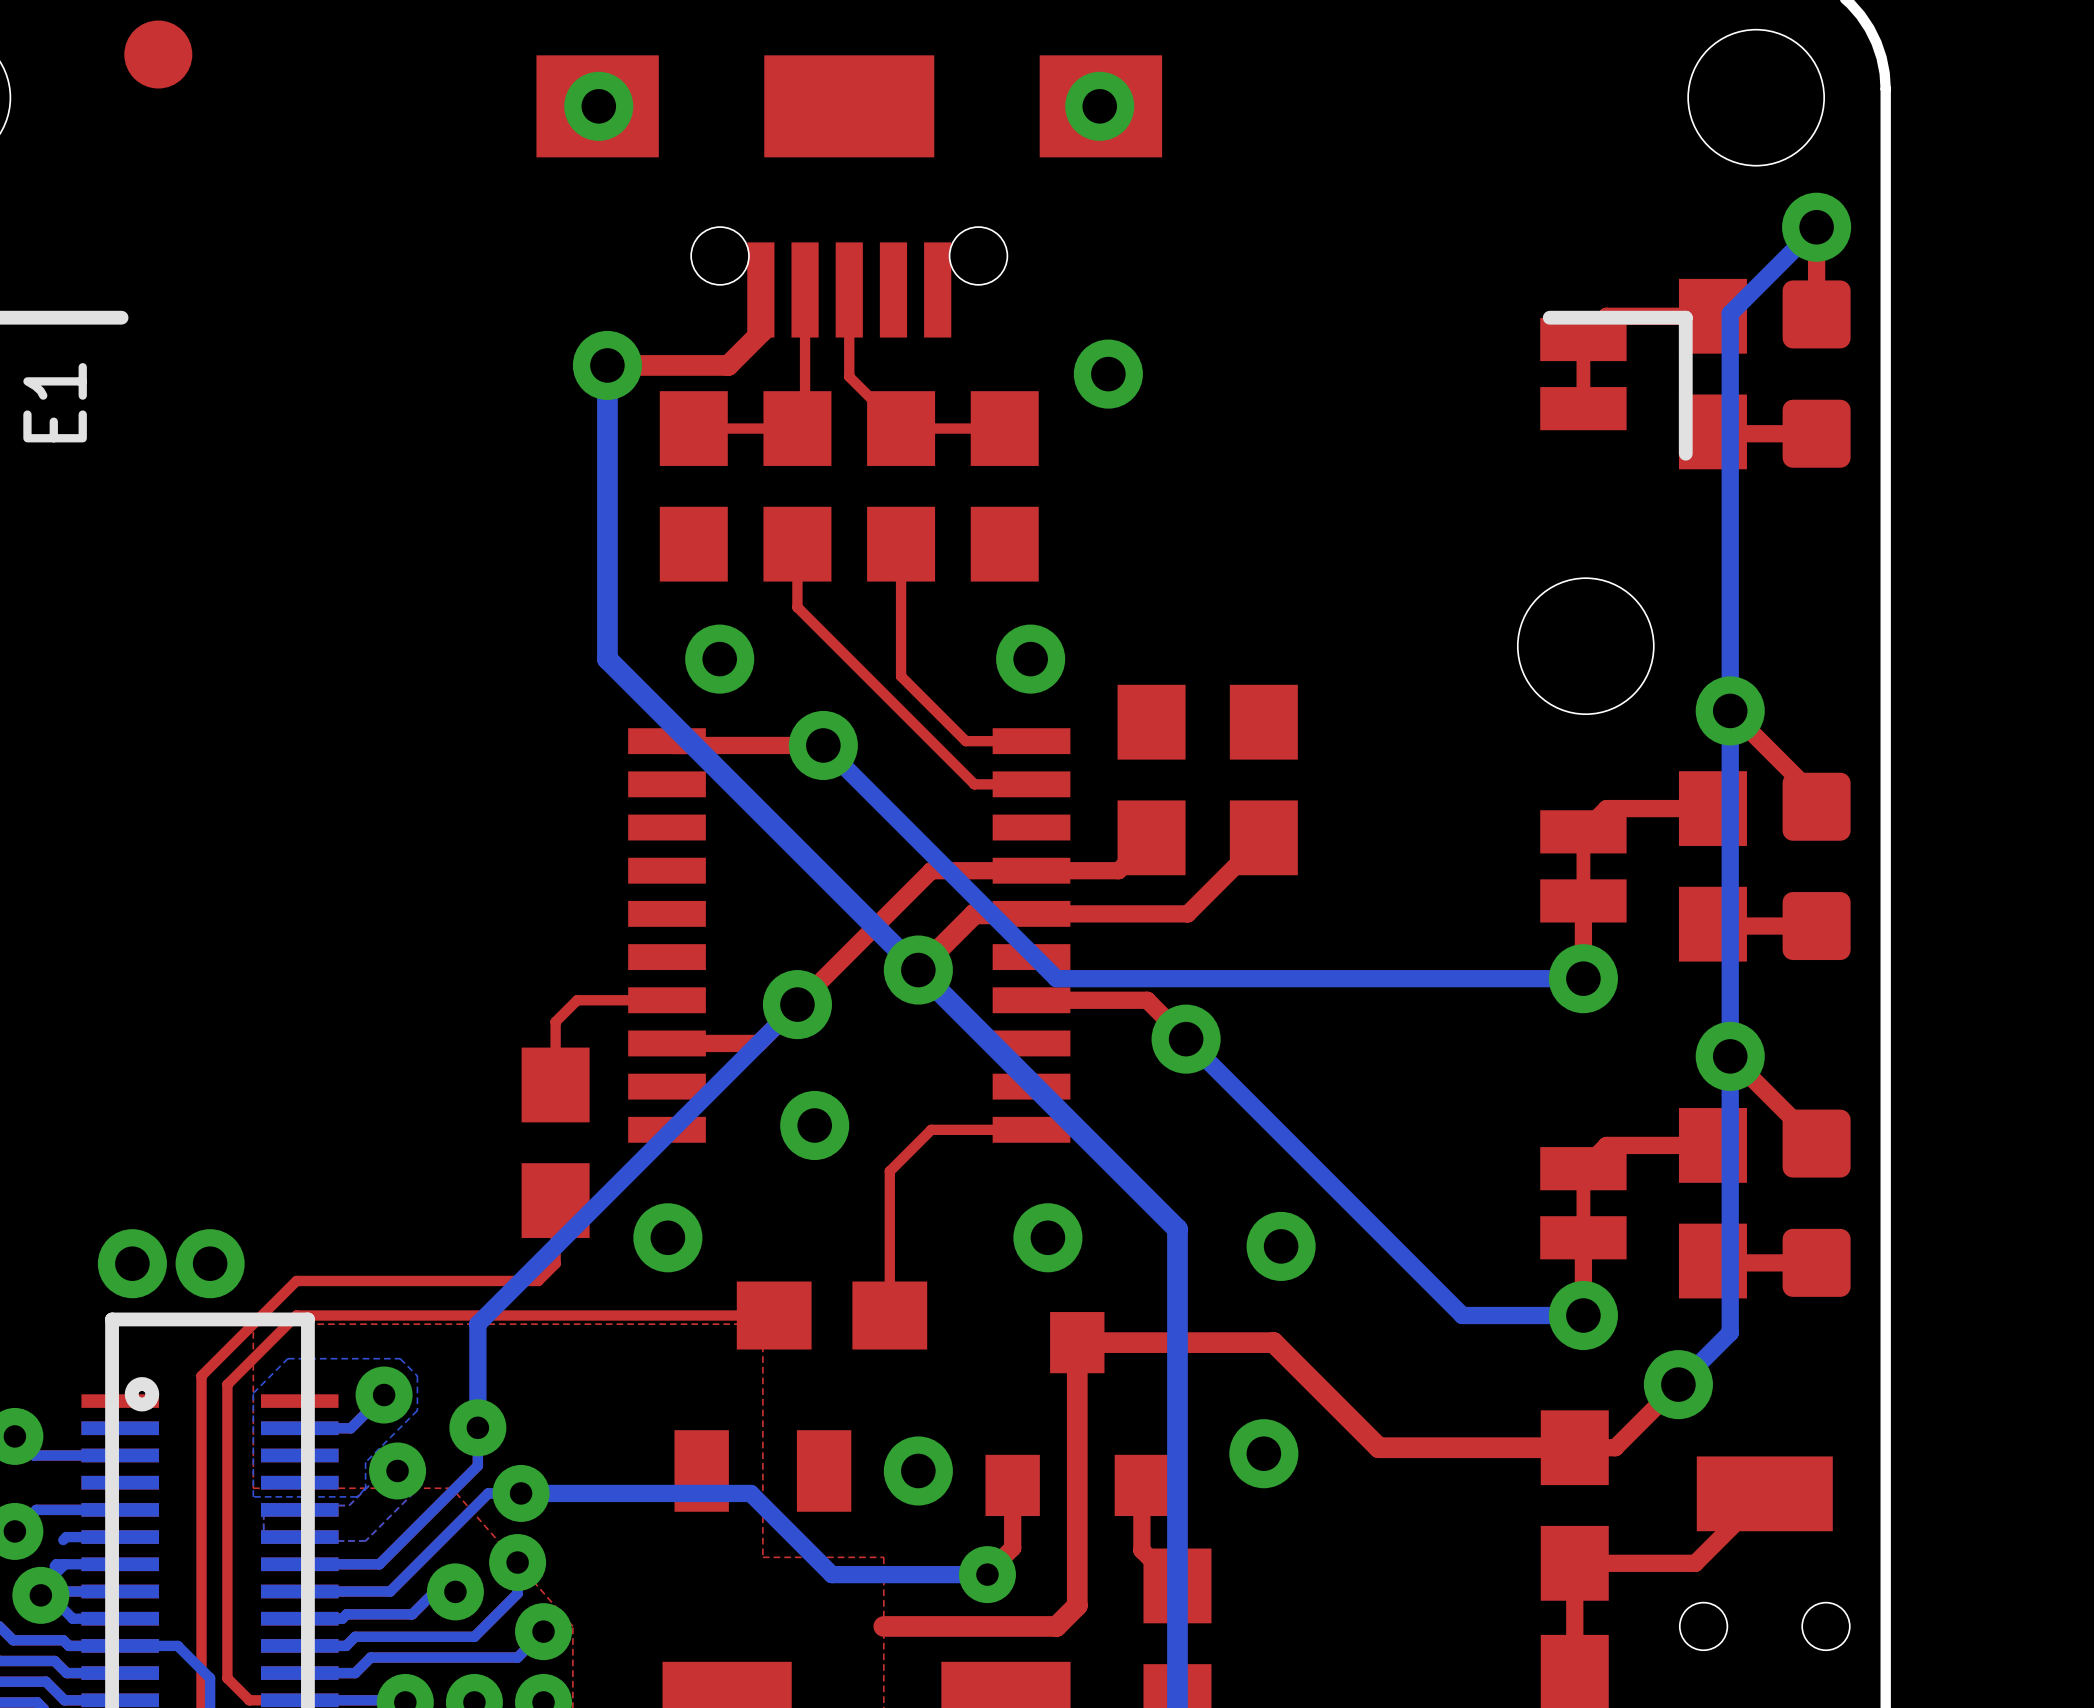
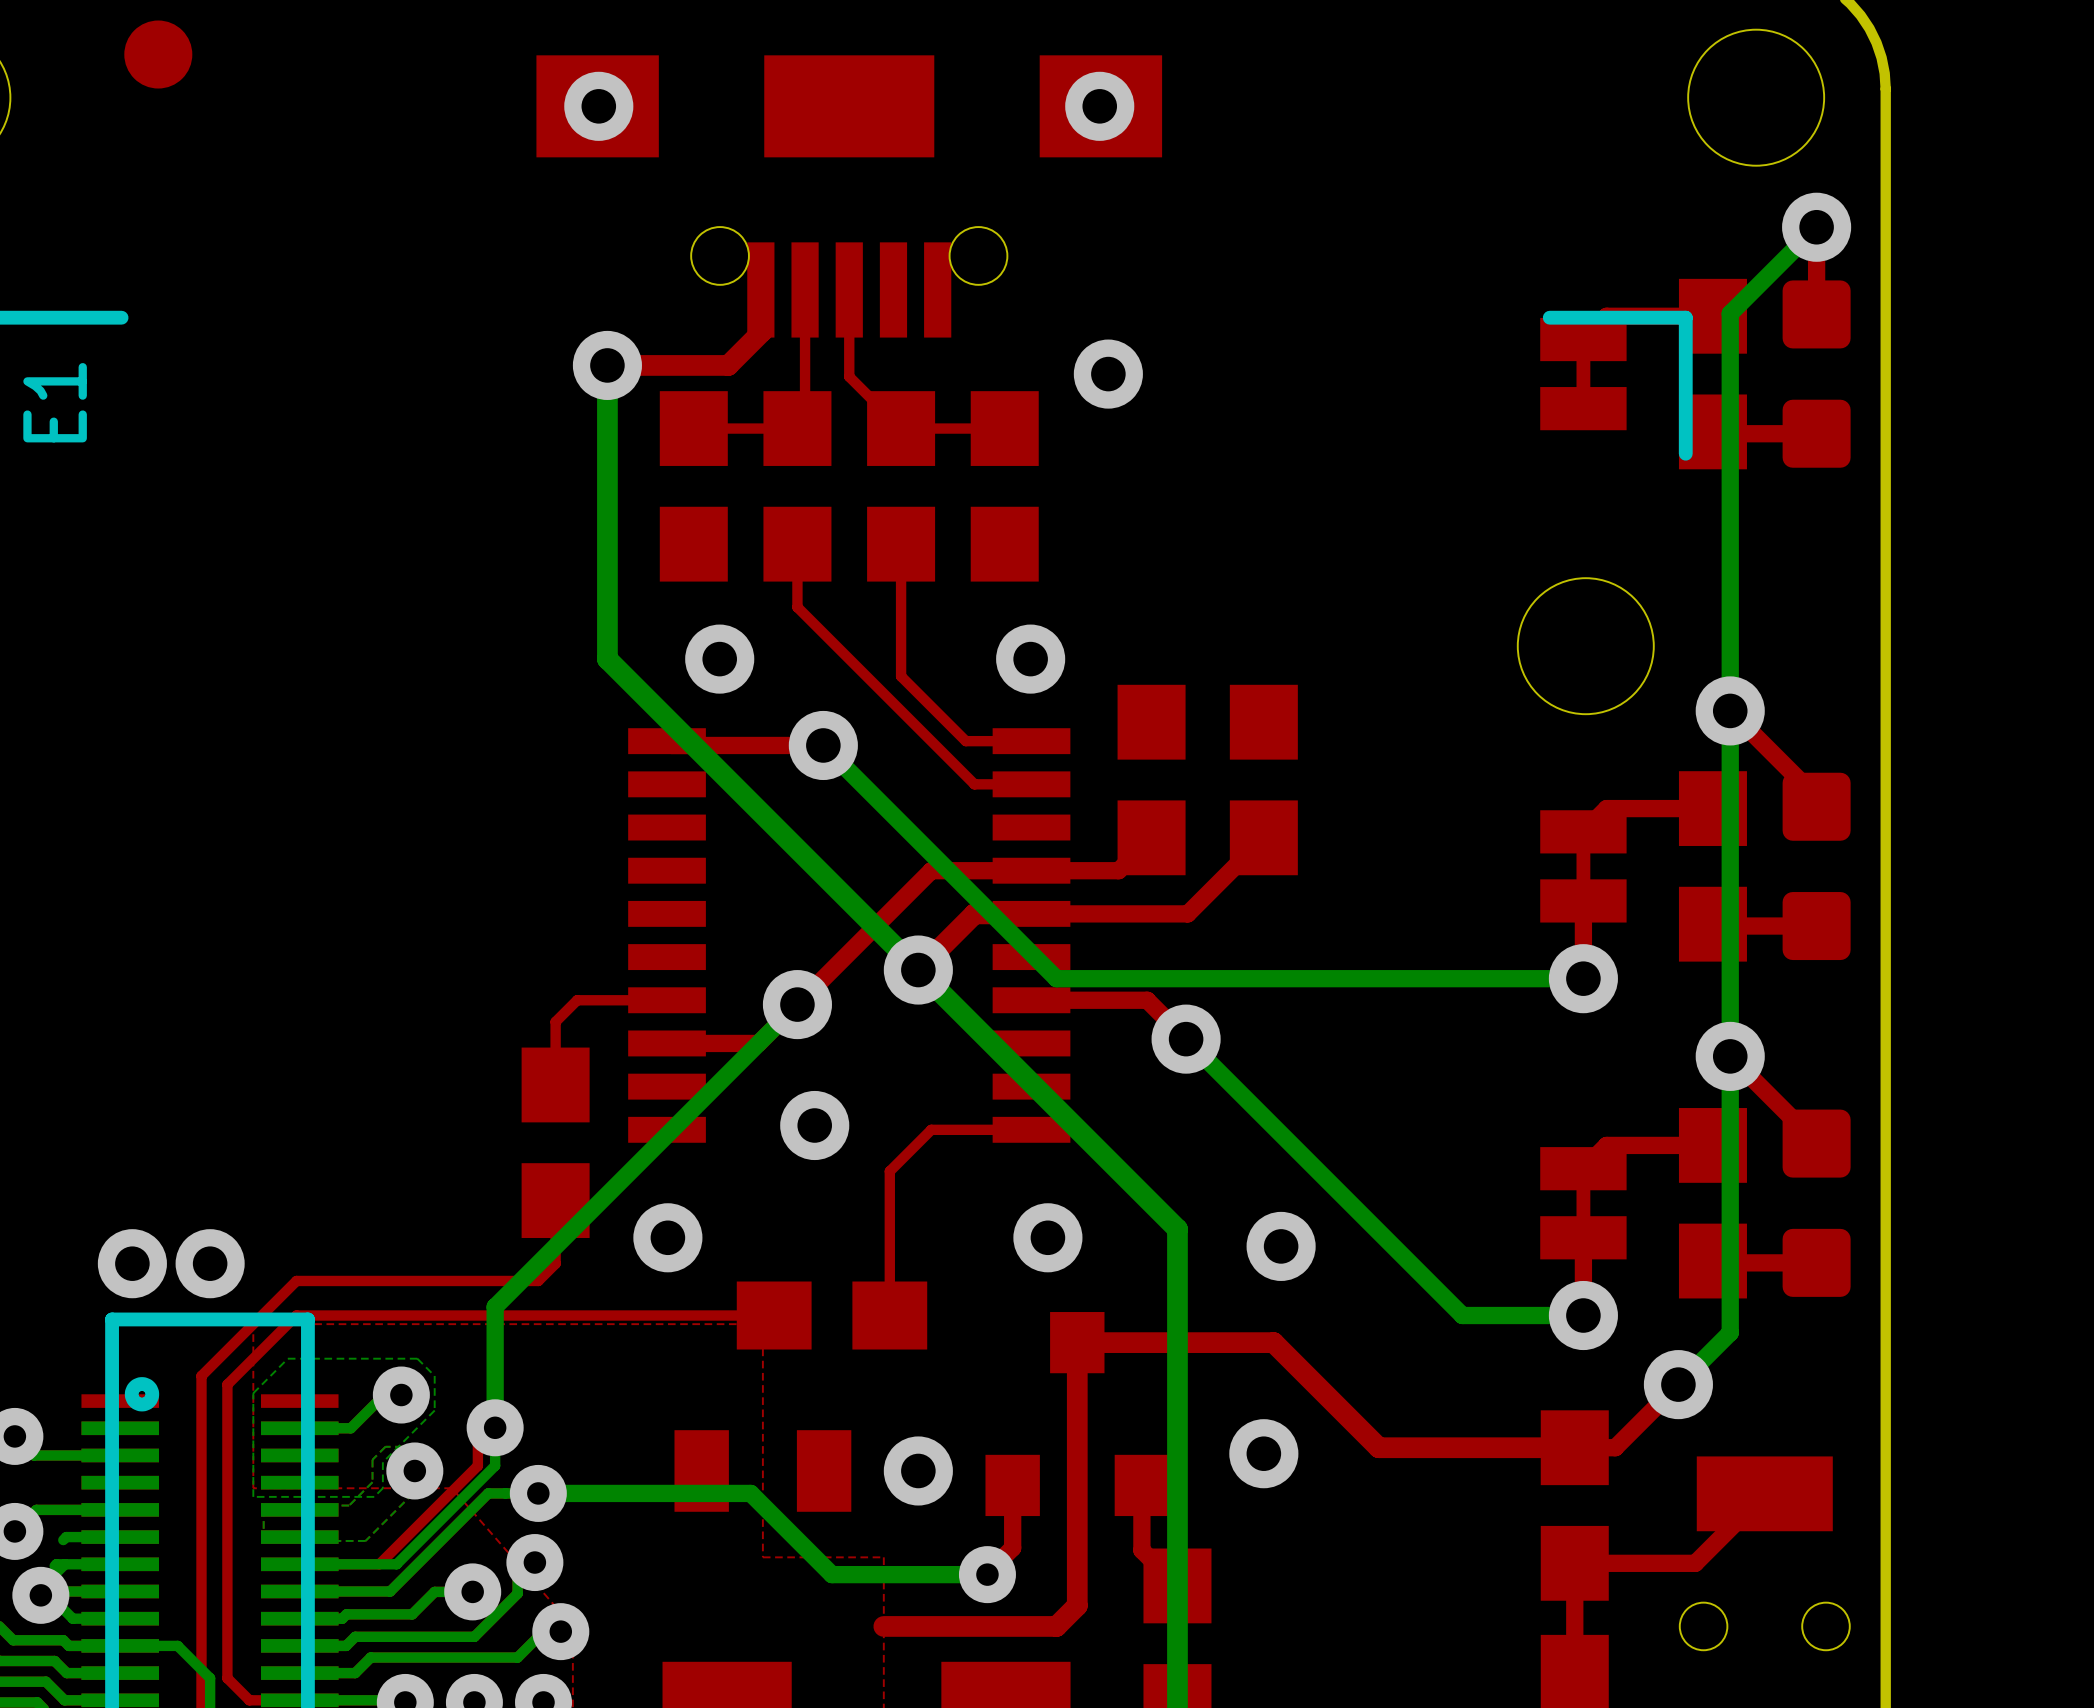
bottom track: (495, 1306) (477, 1324) (477, 1465) (379, 1564) -> (495, 1306) (495, 1465) (396, 1564) (379, 1564)
bottom zone outline: (400, 1358) (417, 1375) (417, 1410) (365, 1462) (365, 1488) (356, 1496) -> (400, 1358) (417, 1358) (434, 1375) (434, 1410) (382, 1462) (382, 1488) (374, 1496) (356, 1496)
via position: (384, 1395) -> (401, 1395)
via position: (477, 1427) -> (495, 1427)
via position: (397, 1470) -> (414, 1470)
via position: (521, 1493) -> (538, 1493)
via position: (517, 1562) -> (534, 1562)
via position: (455, 1591) -> (472, 1591)
via position: (543, 1631) -> (560, 1631)

